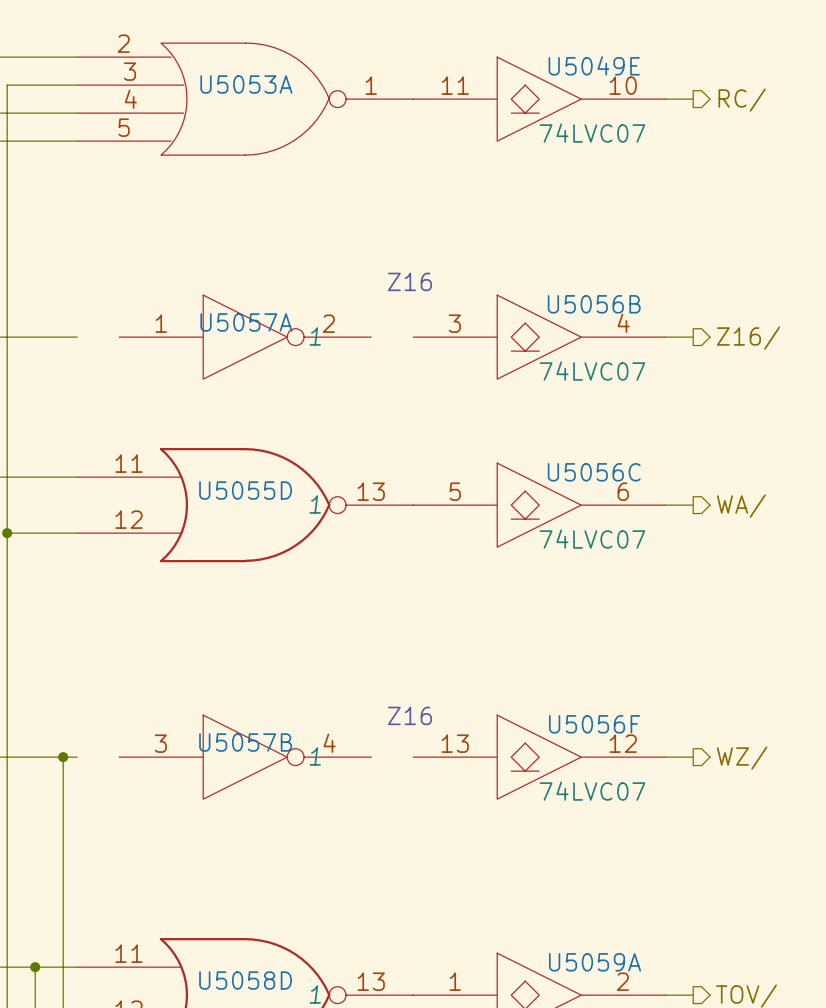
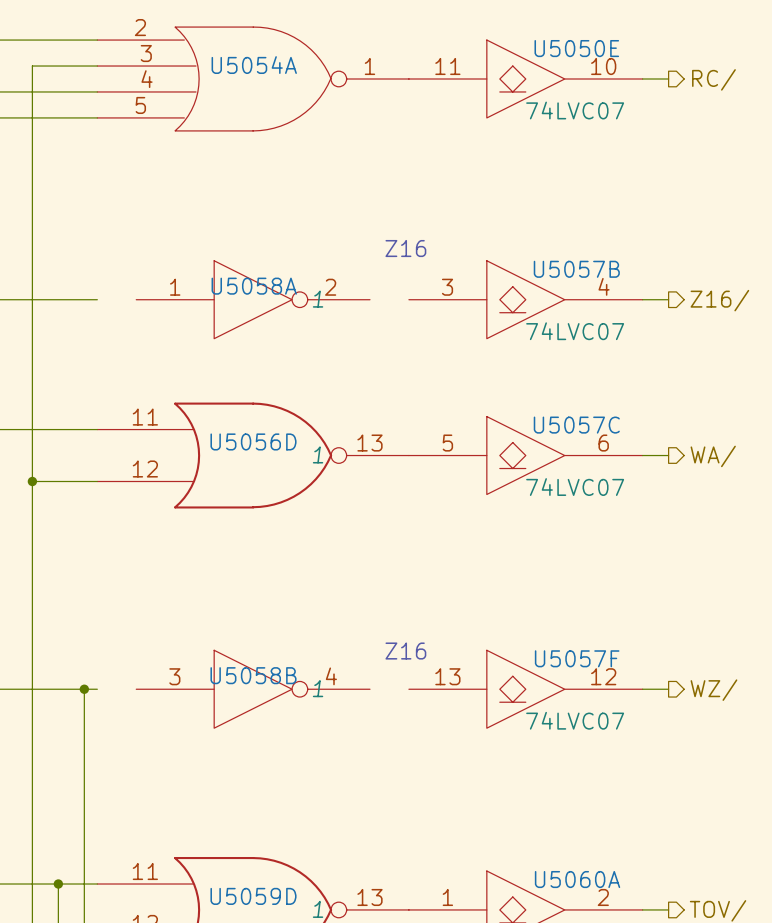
U5049E name: U5049E (594, 65) -> U5050E (576, 48)
U5053A name: U5053A (246, 84) -> U5054A (254, 65)
U5056B name: U5056B (594, 304) -> U5057B (576, 269)
U5057A name: U5057A (246, 322) -> U5058A (254, 286)
U5056C name: U5056C (594, 472) -> U5057C (576, 425)
U5055D name: U5055D (245, 490) -> U5056D (253, 441)
U5056F name: U5056F (594, 724) -> U5057F (577, 658)
U5057B name: U5057B (245, 742) -> U5058B (253, 675)
U5059A name: U5059A (595, 962) -> U5060A (577, 879)
U5058D name: U5058D (245, 980) -> U5059D (253, 896)

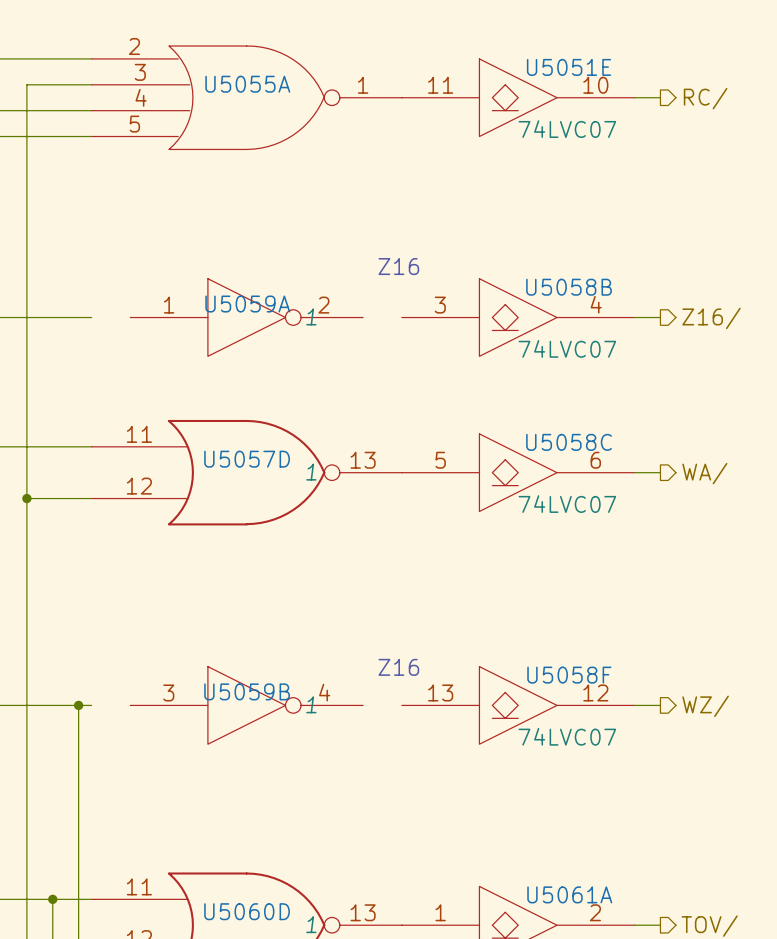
U5050E name: U5050E (576, 48) -> U5051E (569, 67)
U5054A name: U5054A (254, 65) -> U5055A (247, 84)
U5057B name: U5057B (576, 269) -> U5058B (569, 287)
U5058A name: U5058A (254, 286) -> U5059A (247, 304)
U5057C name: U5057C (576, 425) -> U5058C (569, 442)
U5056D name: U5056D (253, 441) -> U5057D (247, 459)
U5057F name: U5057F (577, 658) -> U5058F (569, 675)
U5058B name: U5058B (253, 675) -> U5059B (247, 691)
U5060A name: U5060A (577, 879) -> U5061A (569, 894)
U5059D name: U5059D (253, 896) -> U5060D (247, 911)

